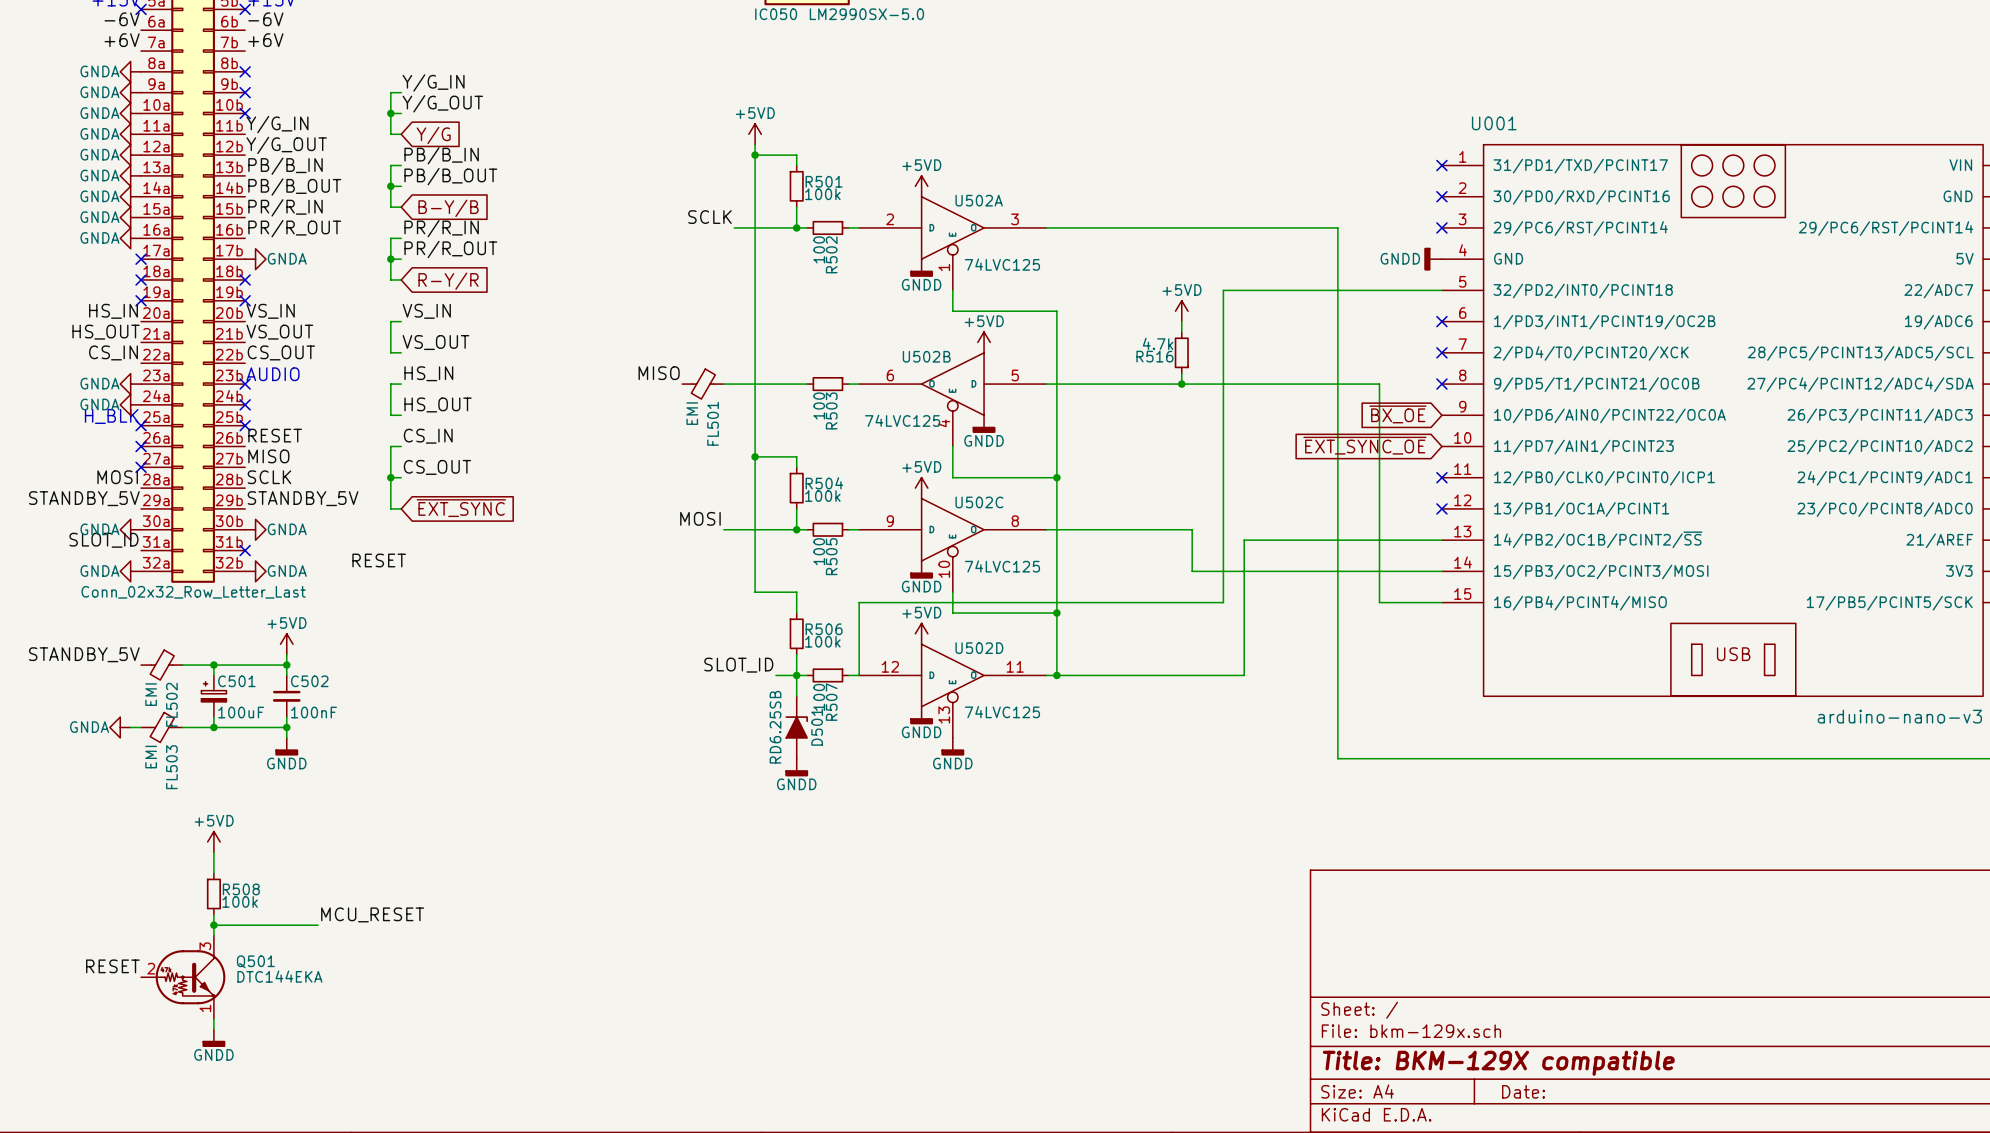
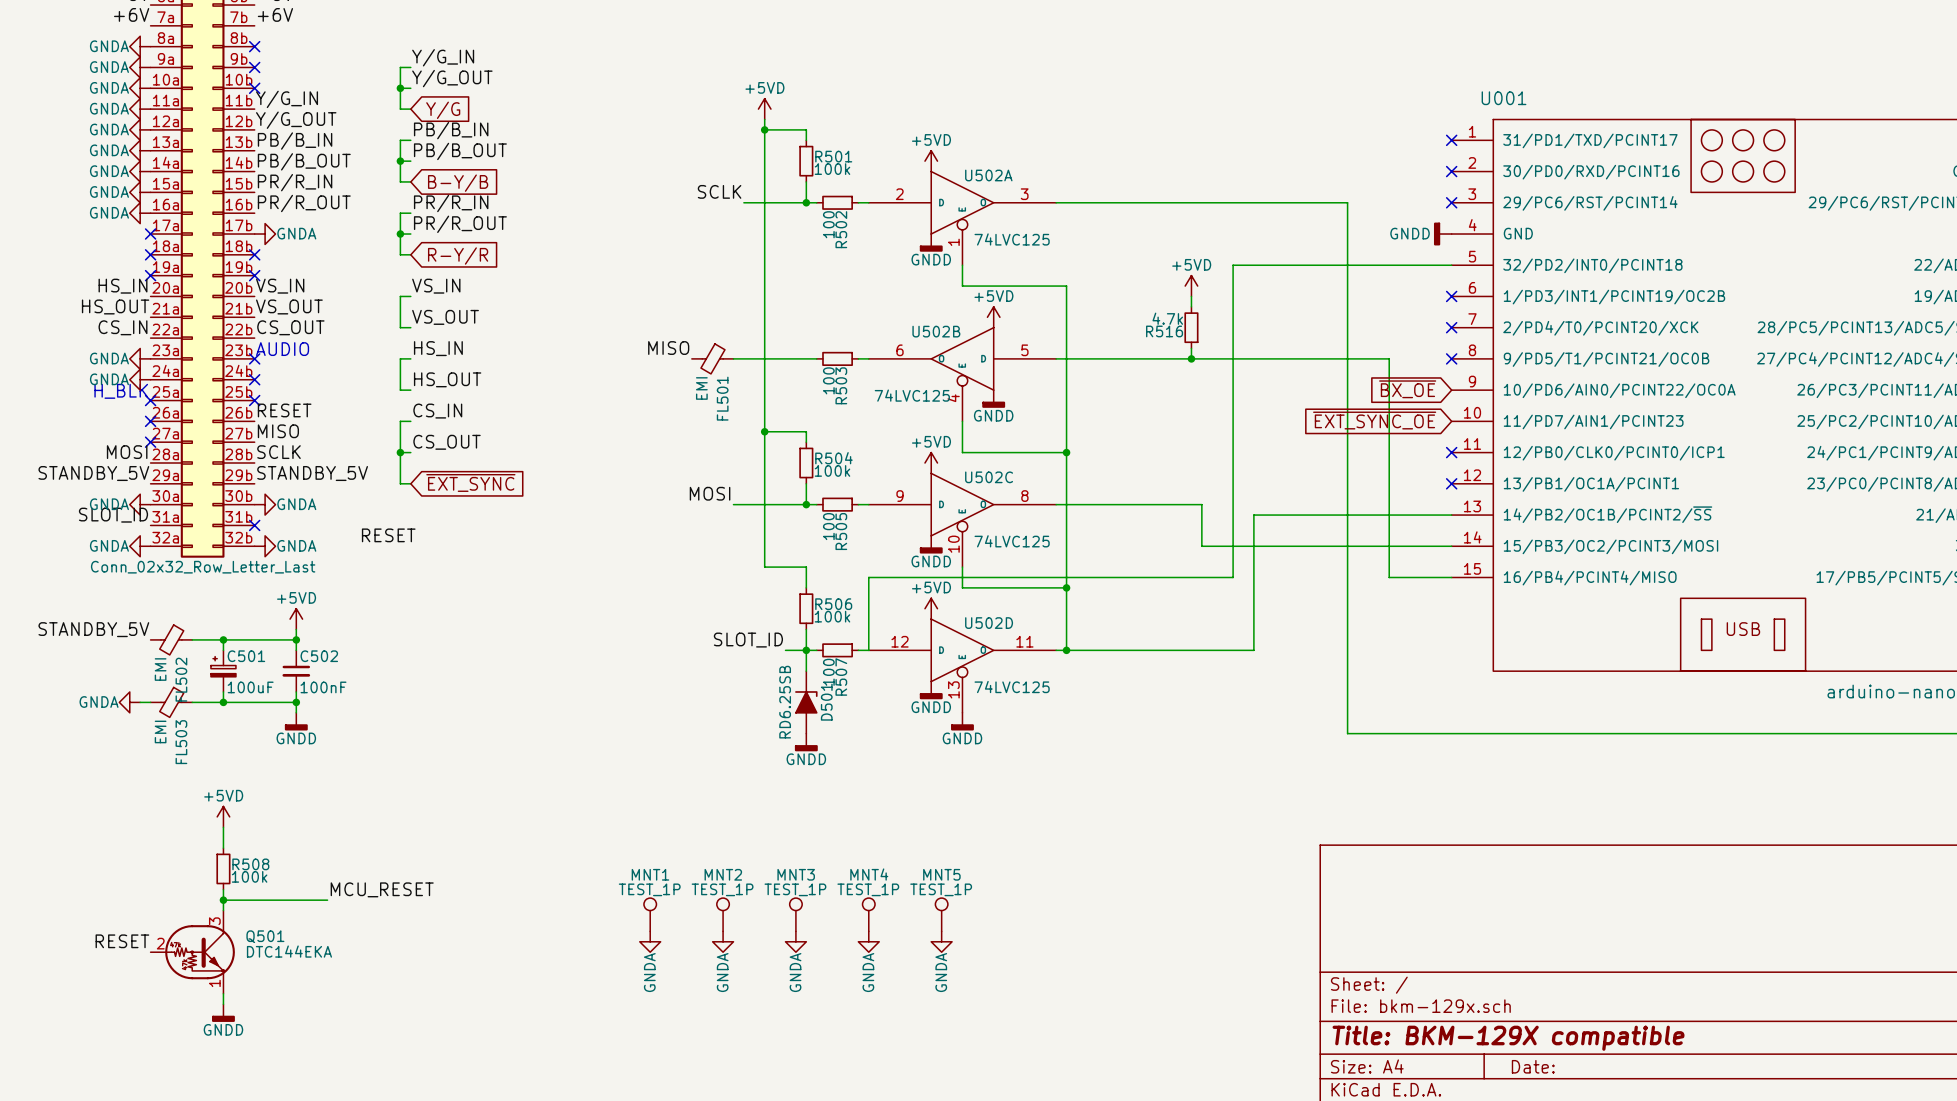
MNT1: none -> TEST_1P (650, 914)
MNT2: none -> TEST_1P (723, 914)
MNT3: none -> TEST_1P (795, 914)
MNT4: none -> TEST_1P (868, 914)
MNT5: none -> TEST_1P (941, 914)
power symbol: none -> GNDA (650, 941)
power symbol: none -> GNDA (723, 941)
power symbol: none -> GNDA (795, 941)
power symbol: none -> GNDA (868, 941)
power symbol: none -> GNDA (941, 941)

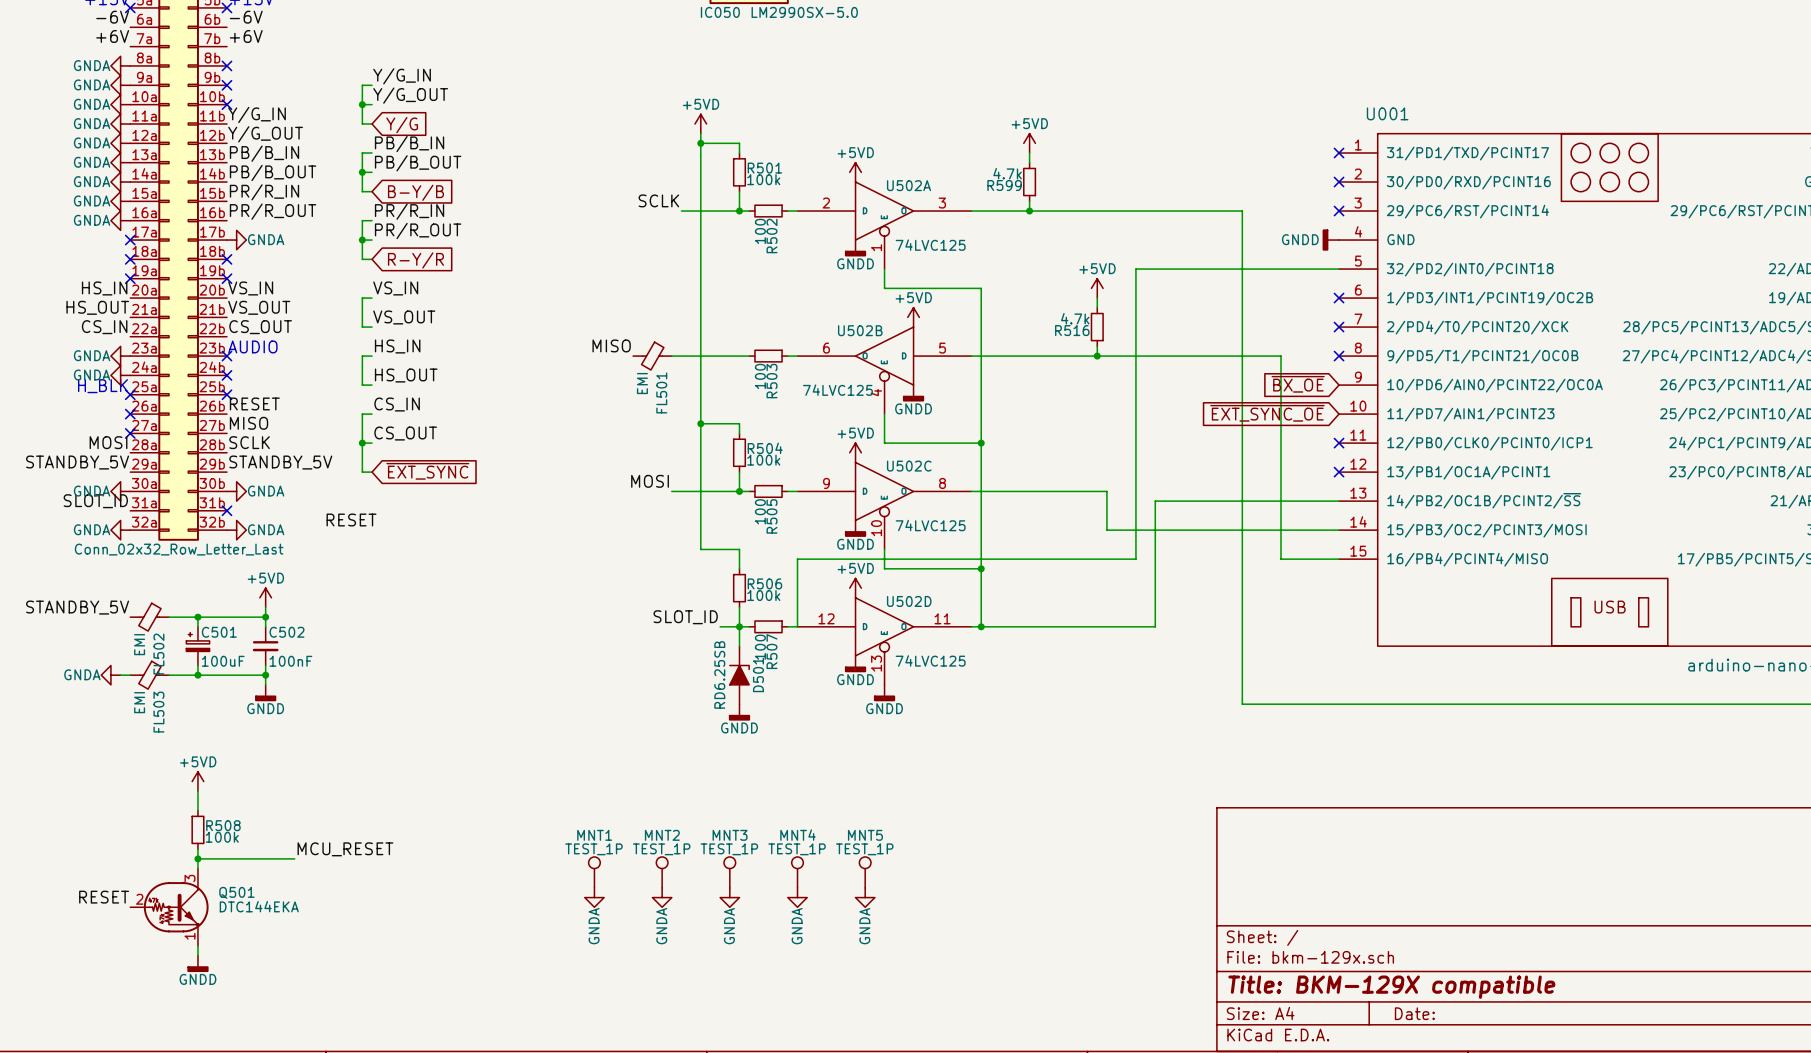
power symbol: none -> +5VD (1029, 143)
wire: none -> (1029, 153) (1029, 162)
R599: none -> 4.7k (1029, 182)
wire: none -> (1029, 201) (1029, 211)
junction: none -> (1029, 211)

